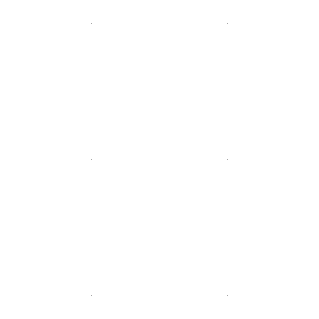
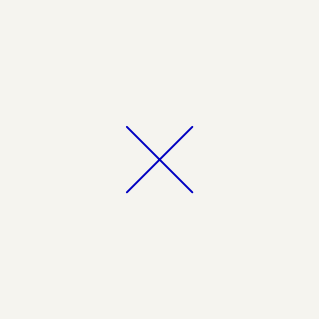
no-connect mark: none -> (159, 159)

